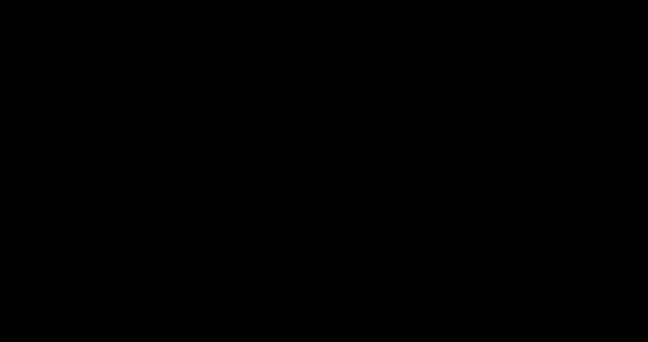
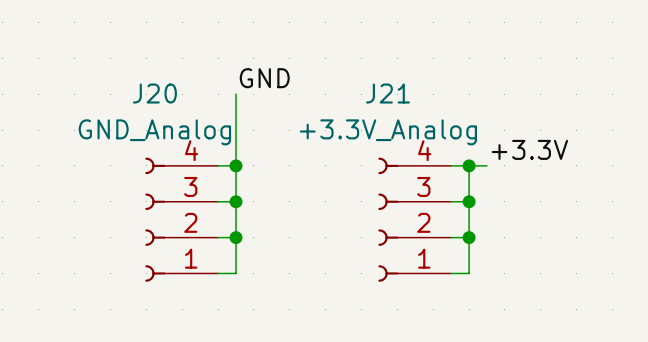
label: none -> GND (264, 78)
wire: none -> (236, 94) (236, 273) (218, 273)
label: none -> +3.3V (529, 149)
wire: none -> (218, 165) (236, 165)
junction: none -> (236, 165)
wire: none -> (451, 165) (487, 165)
wire: none -> (469, 165) (469, 273) (451, 273)
junction: none -> (469, 165)
wire: none -> (218, 201) (236, 201)
junction: none -> (236, 201)
wire: none -> (451, 201) (469, 201)
junction: none -> (469, 201)
J20: none -> GND_Analog (181, 219)
J21: none -> +3.3V_Analog (414, 219)
wire: none -> (218, 237) (236, 237)
junction: none -> (236, 237)
wire: none -> (451, 237) (469, 237)
junction: none -> (469, 237)

